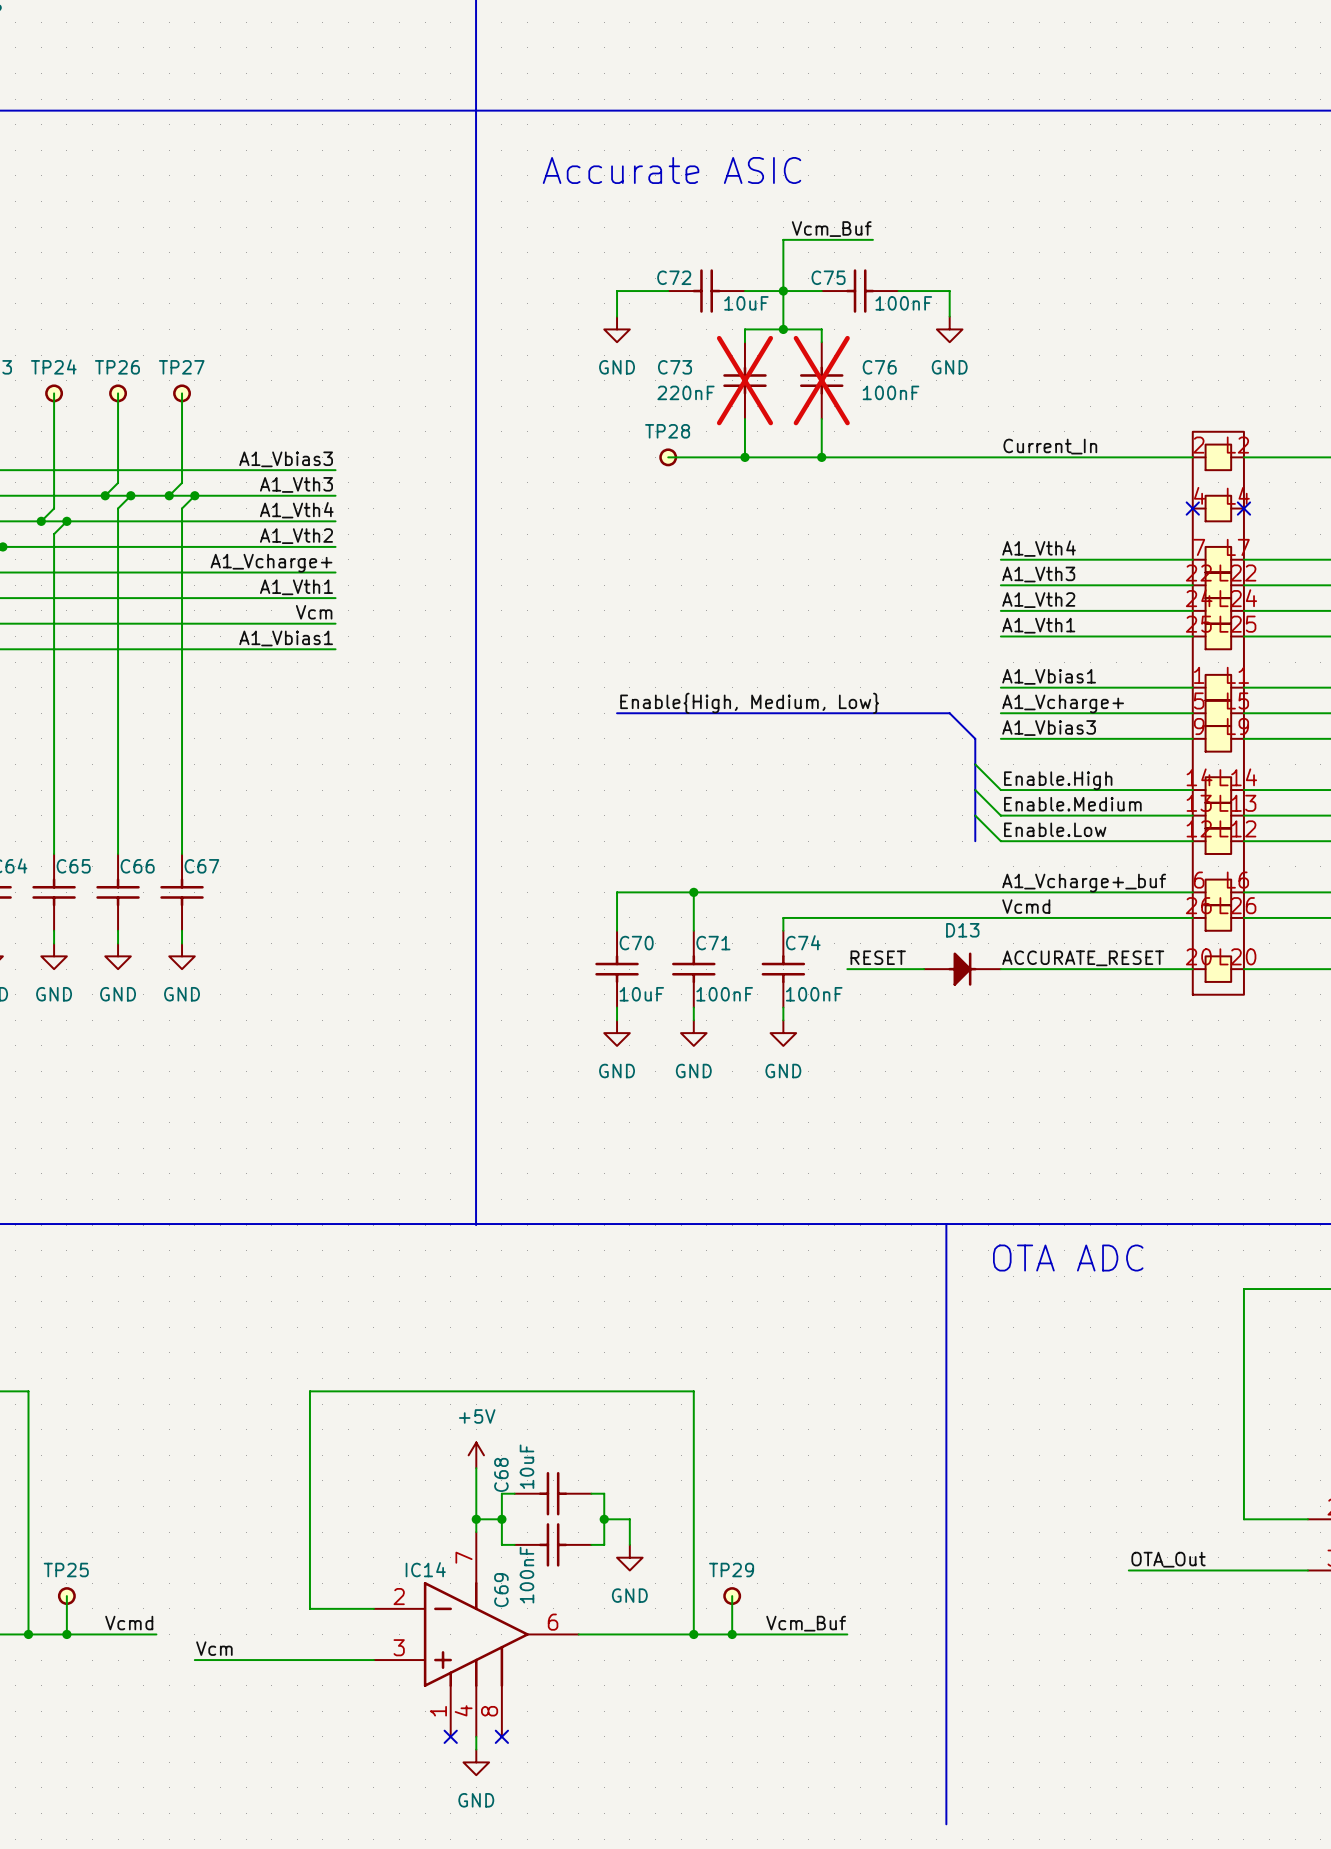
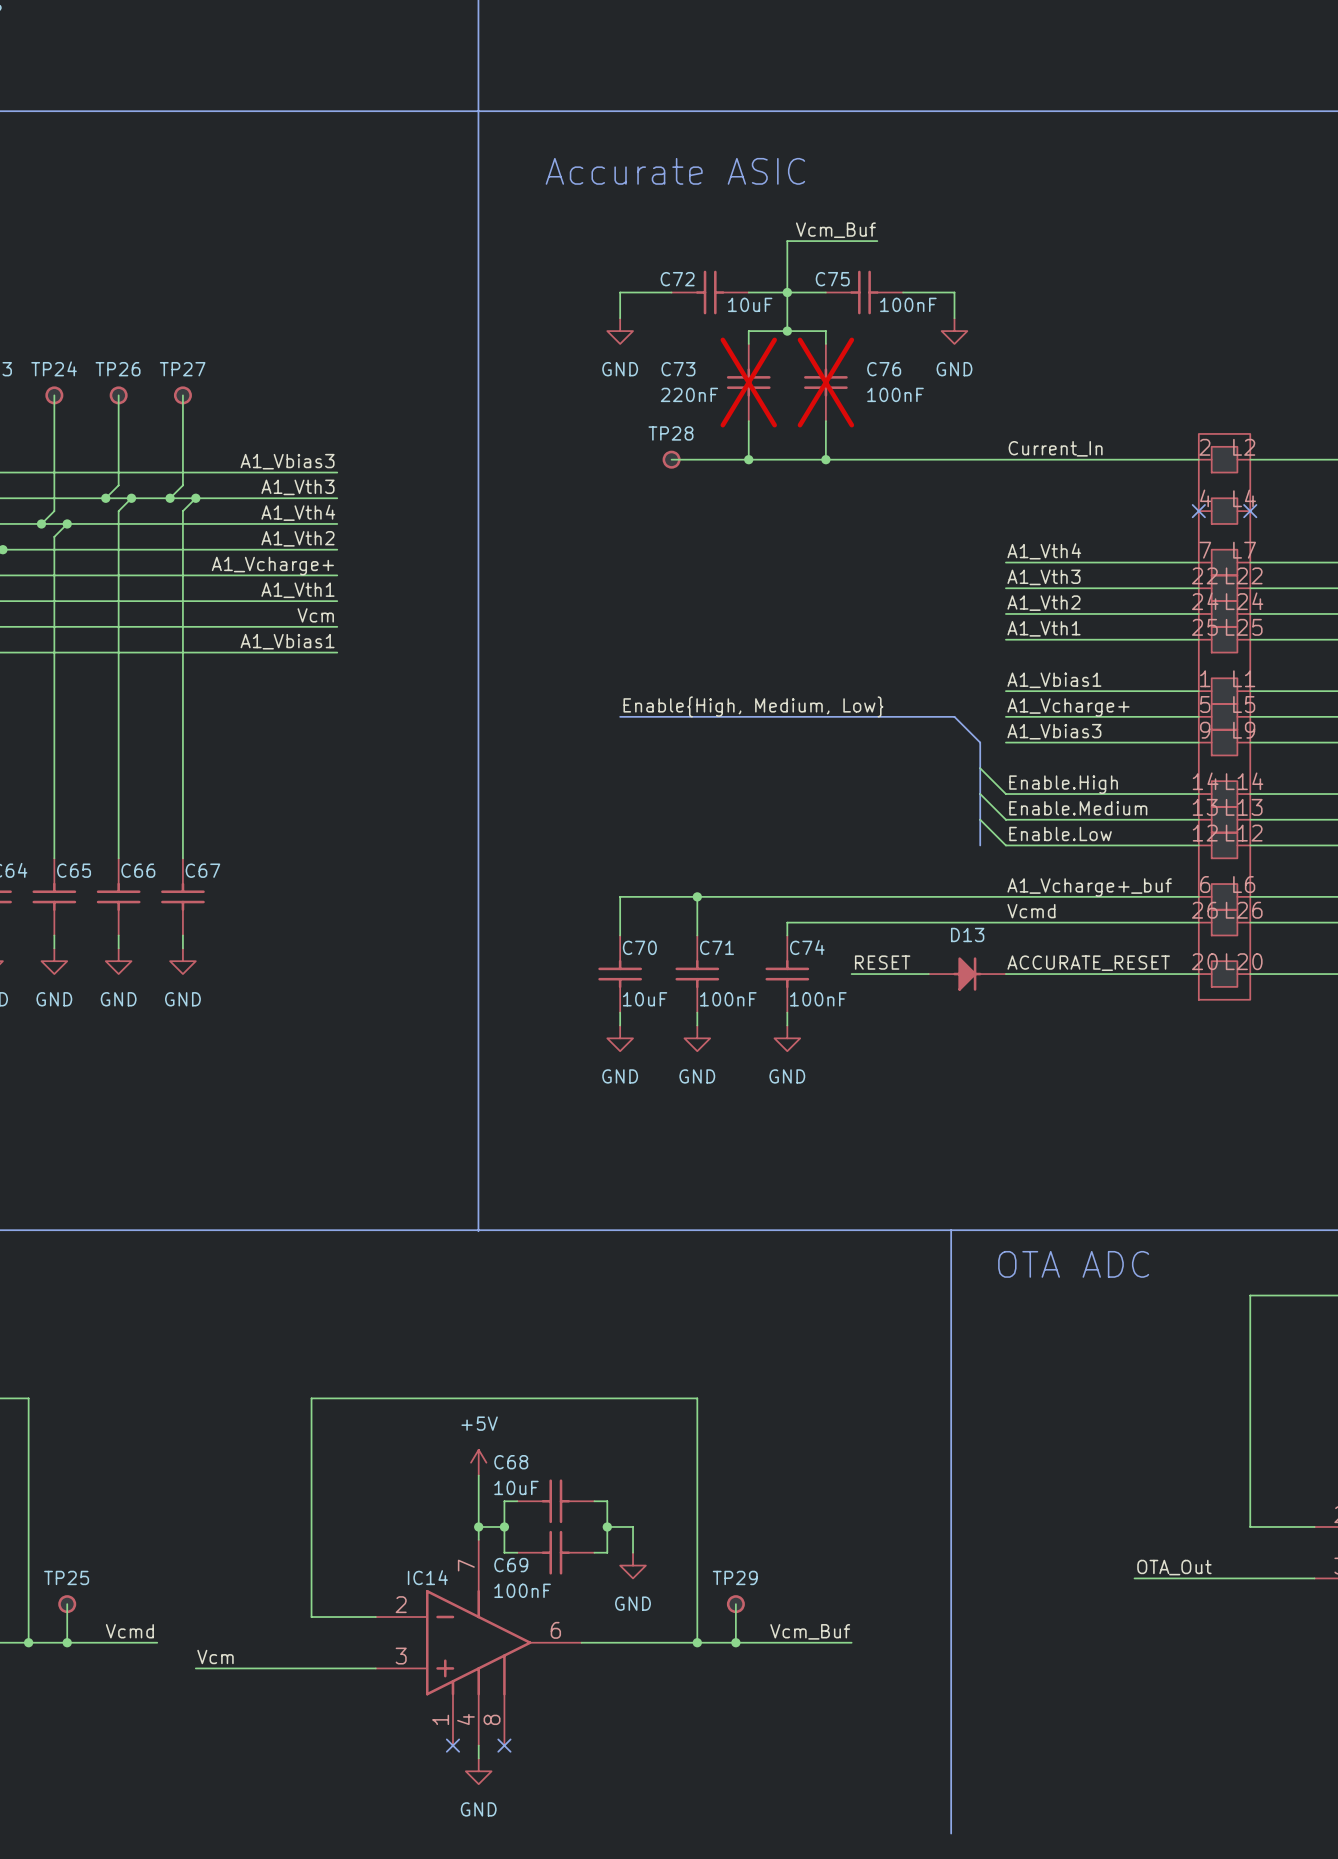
C68 text rotation: 0° (527, 1466) -> 90° clockwise (516, 1487)
C68 name rotation: 0° (501, 1474) -> 90° clockwise (511, 1462)
C69 text rotation: 0° (527, 1575) -> 90° clockwise (522, 1590)
C69 name rotation: 0° (501, 1590) -> 90° clockwise (511, 1565)

